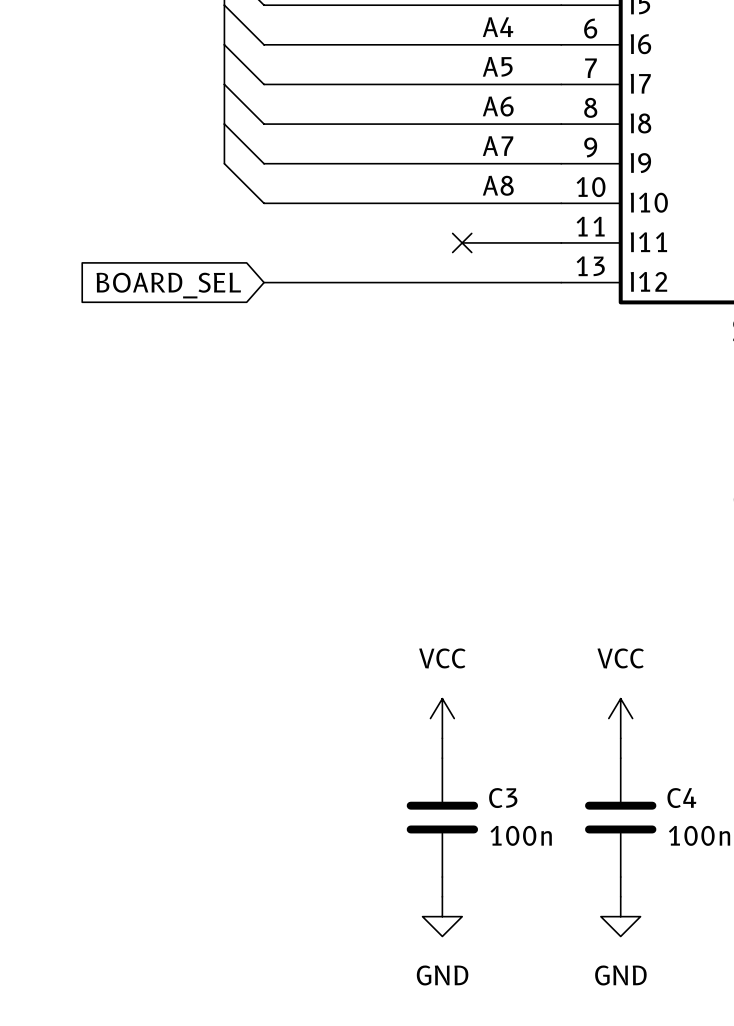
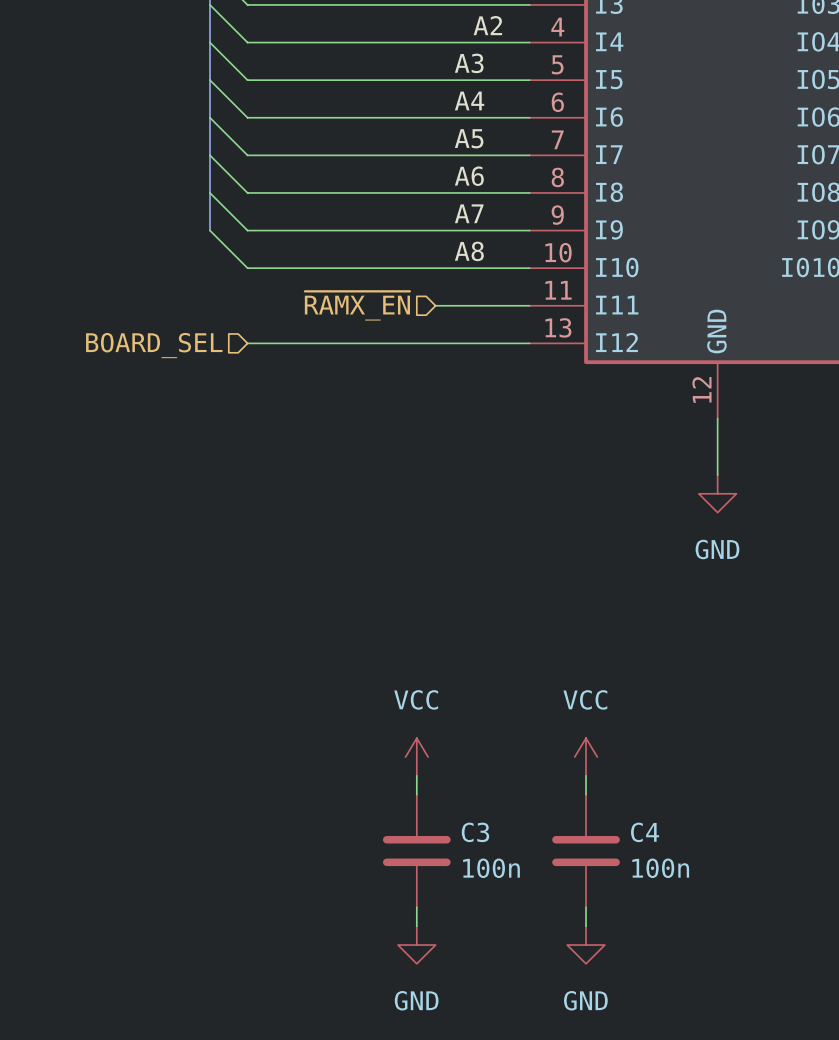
hierarchical label: none -> ~{RAMX_EN} (357, 305)
no-connect mark: (462, 242) -> none
hierarchical label: none -> BOARD_SEL (154, 345)
global label: BOARD_SEL (168, 285) -> none

